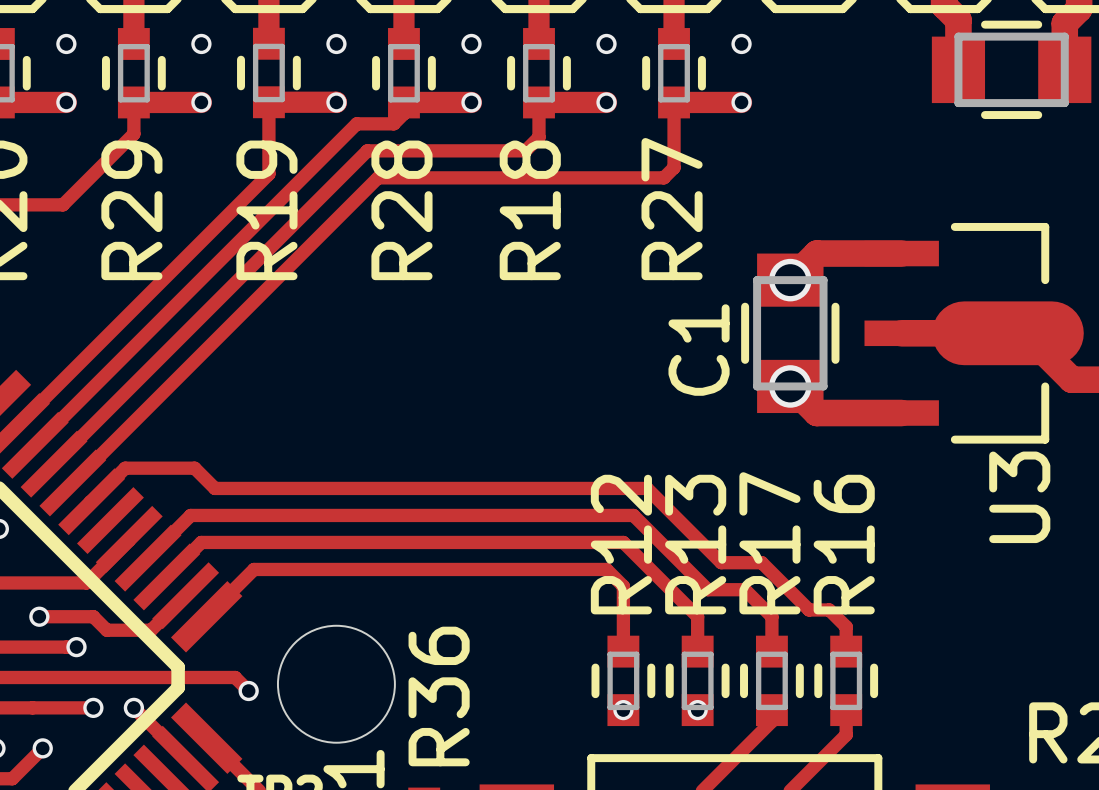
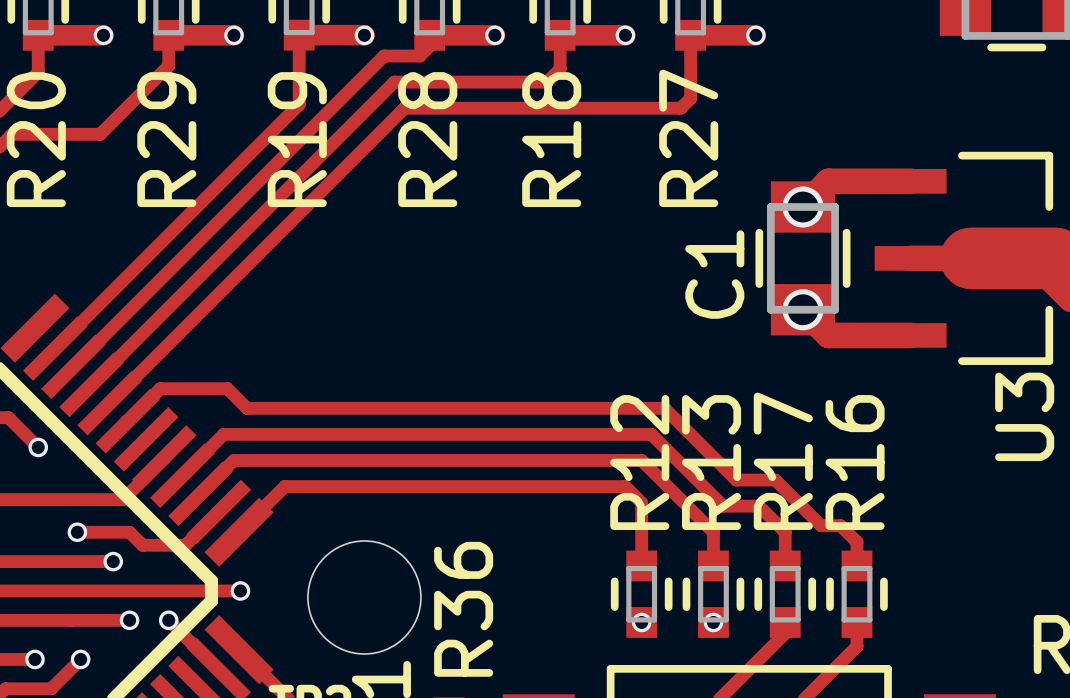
track: (208, 677) (235, 677) (248, 690) -> none
via position: (248, 690) -> (240, 590)

